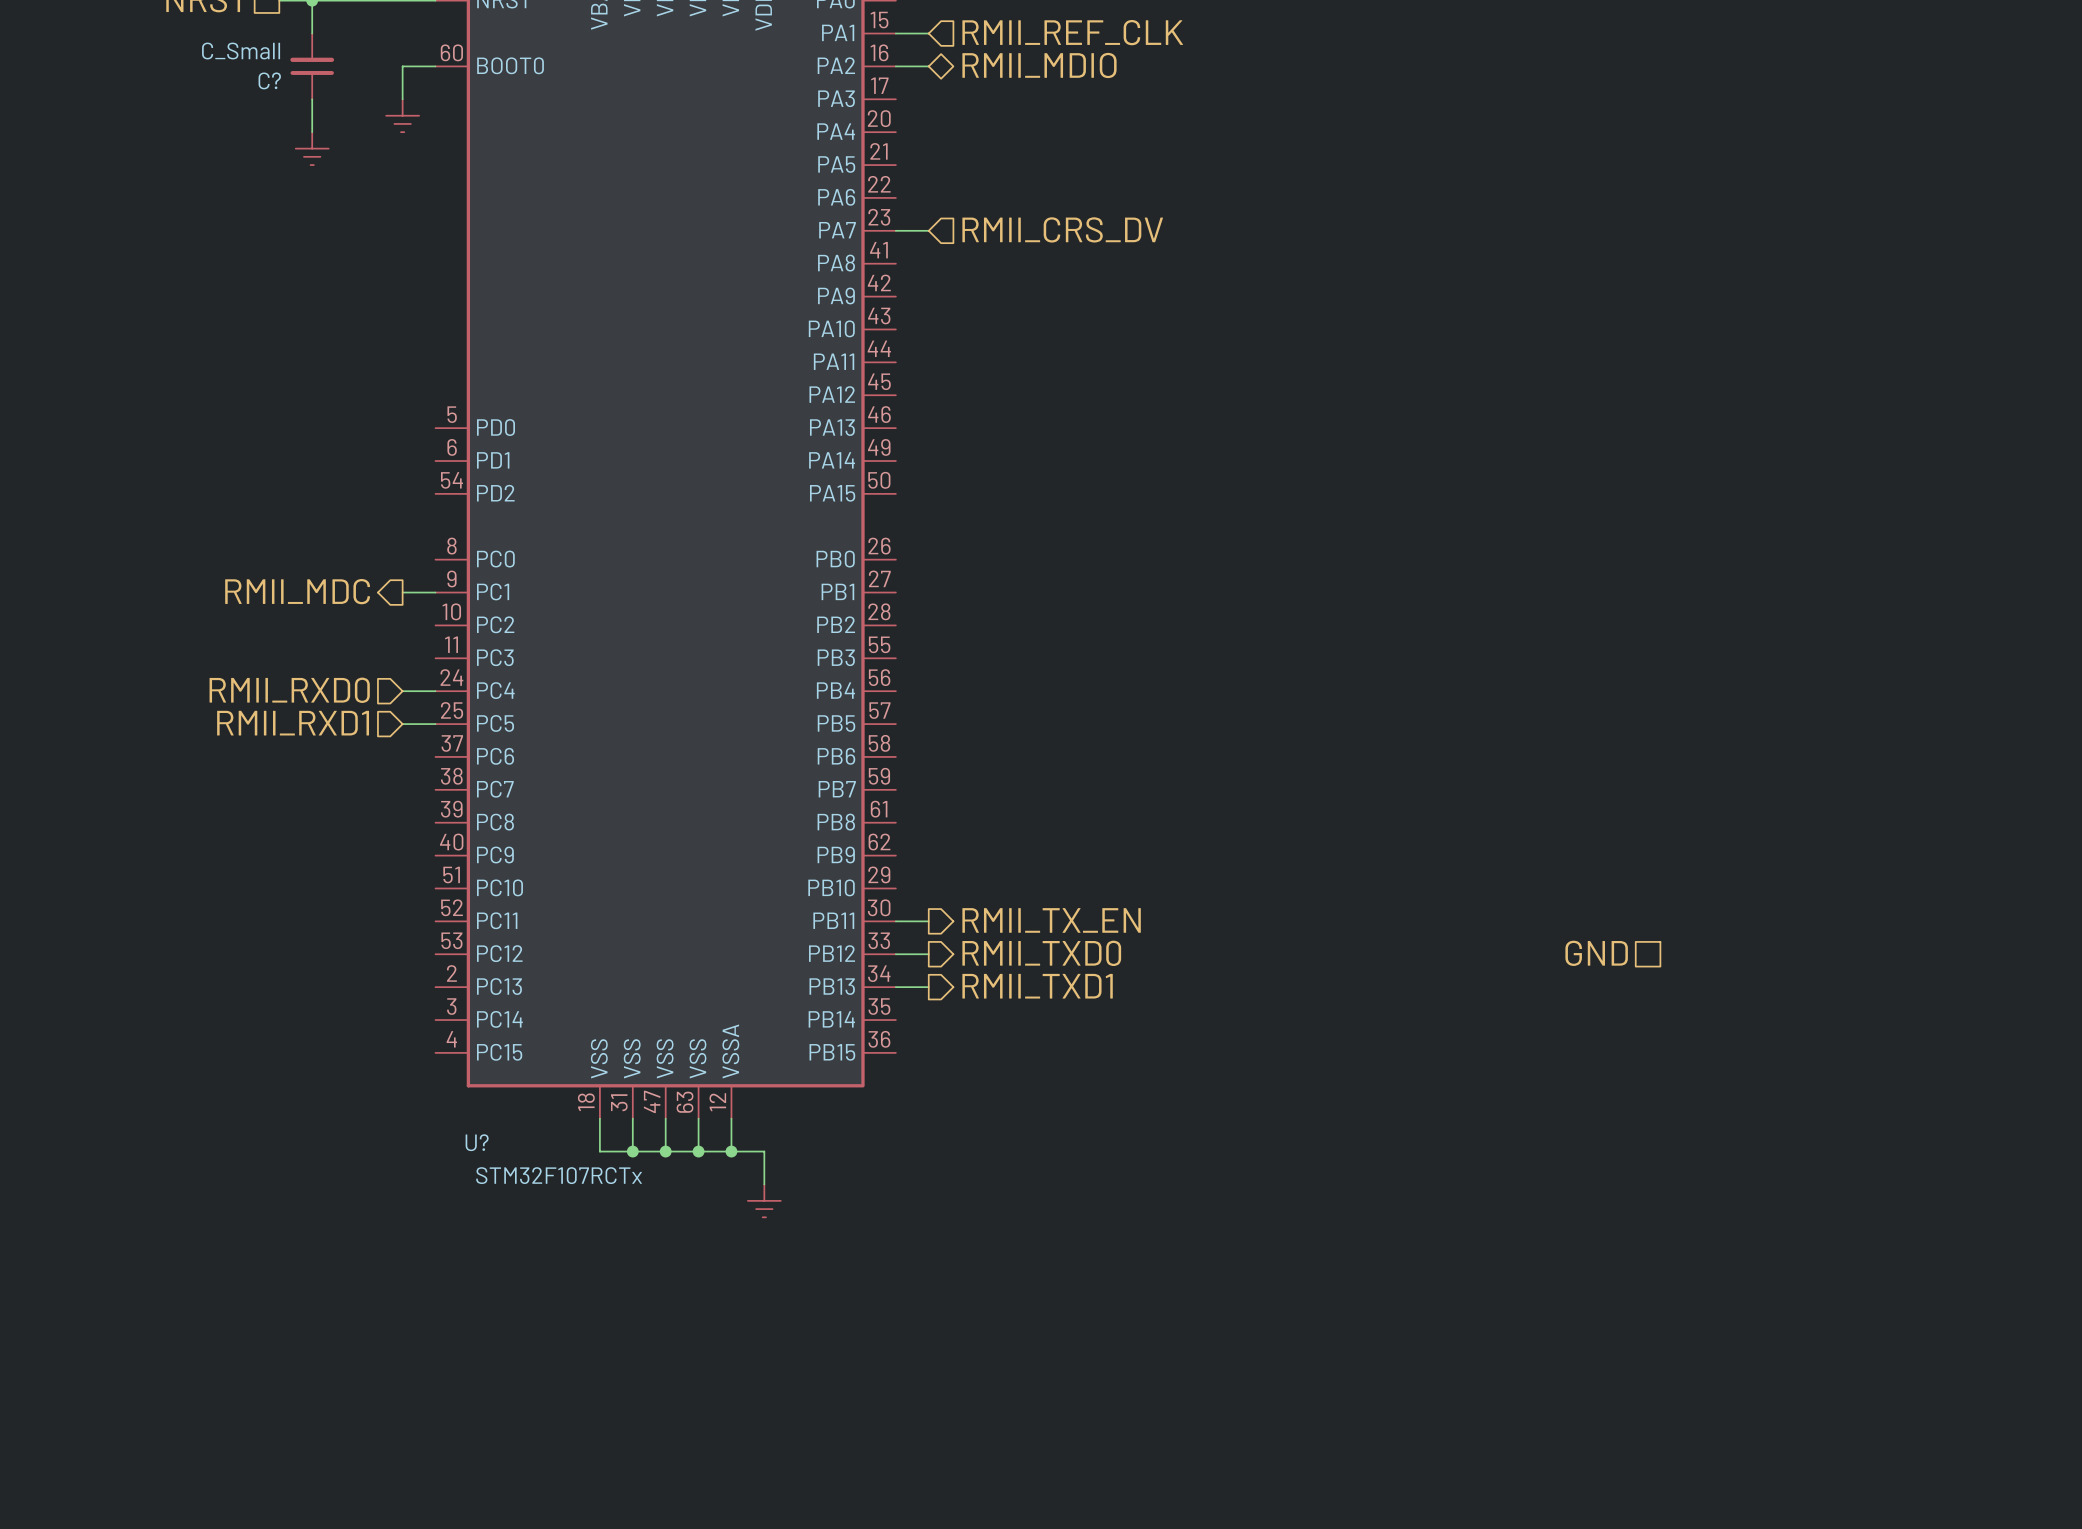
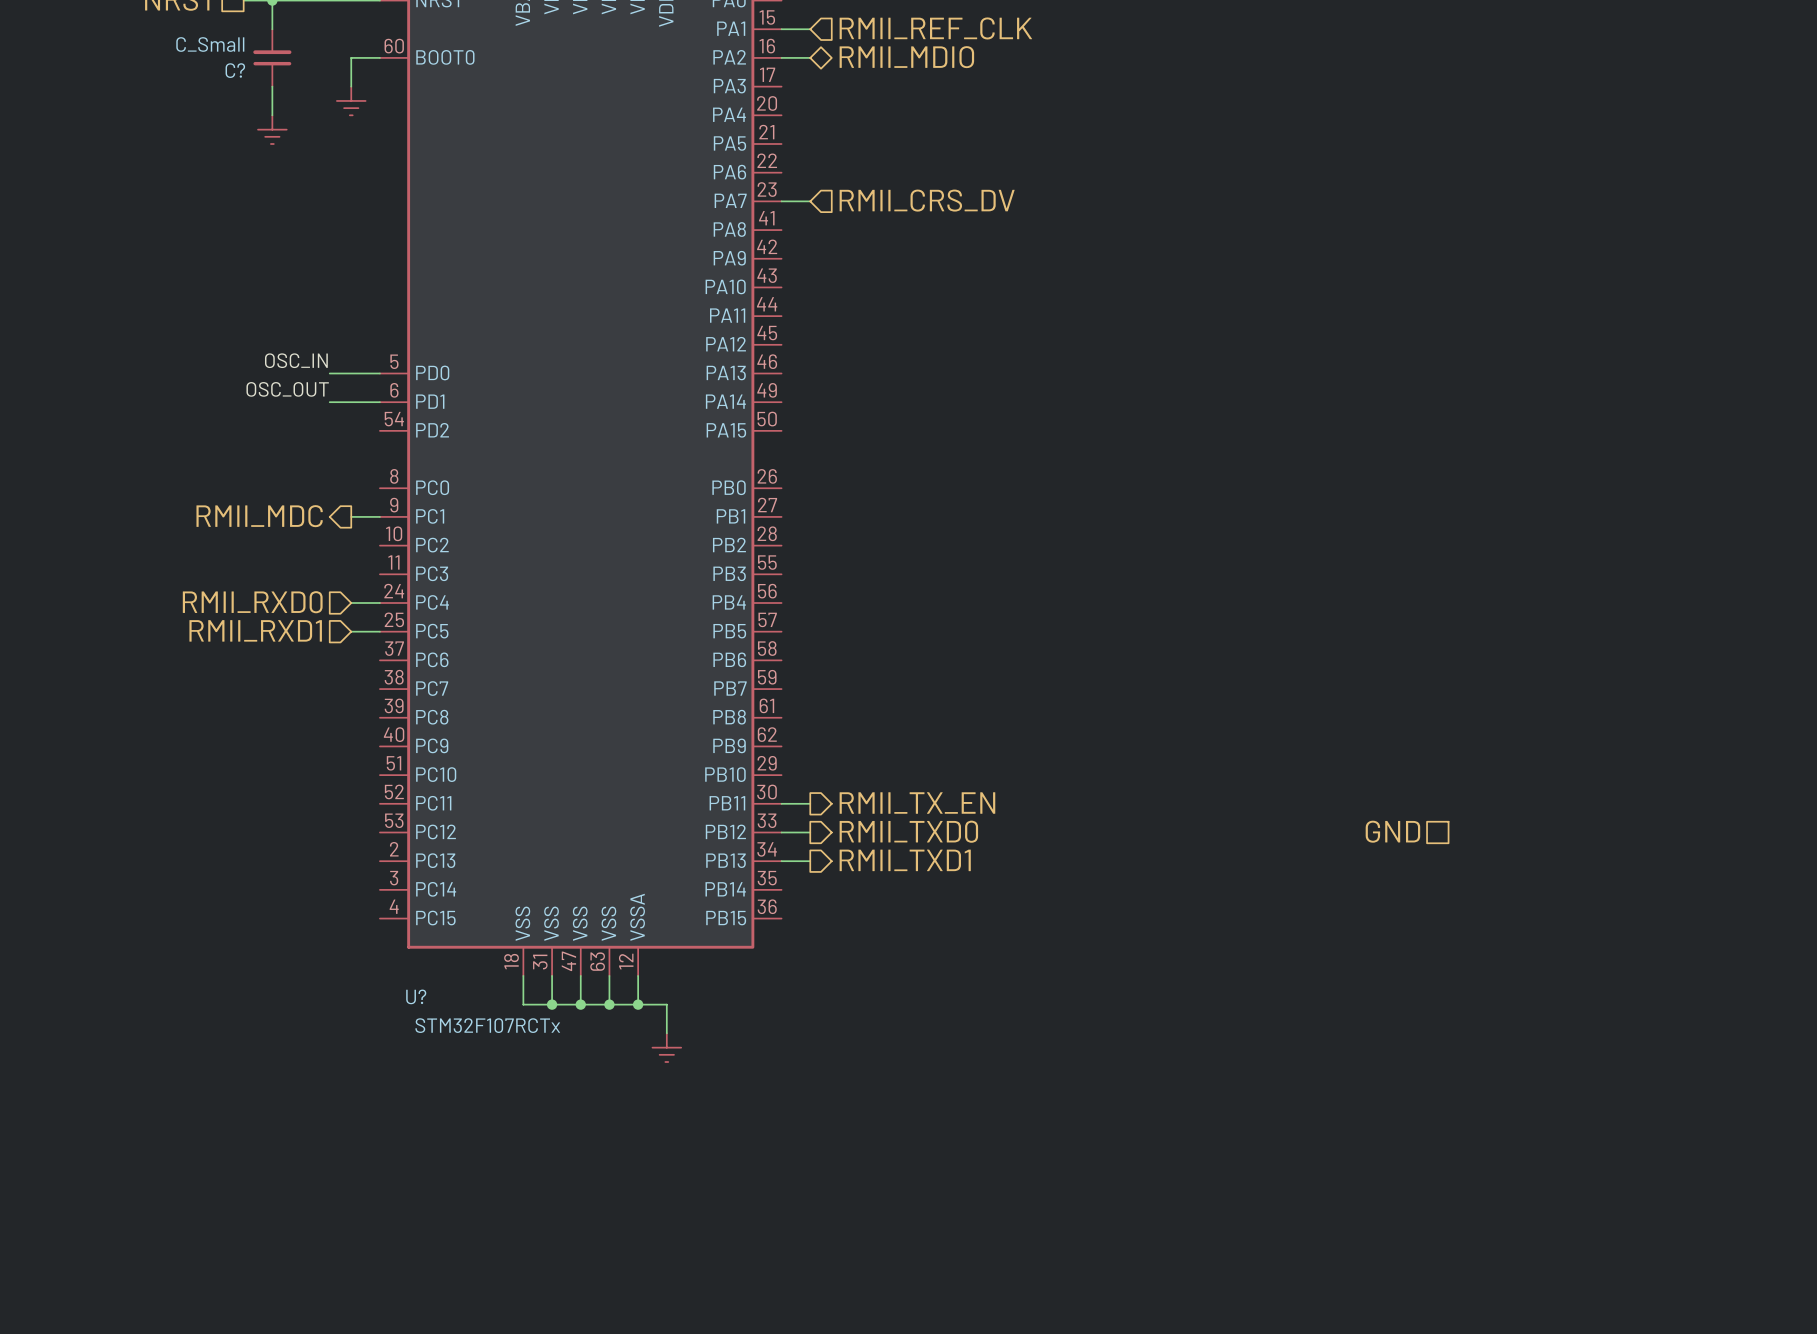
label: none -> OSC_IN (296, 360)
wire: none -> (329, 373) (379, 373)
label: none -> OSC_OUT (287, 389)
wire: none -> (329, 402) (379, 402)

